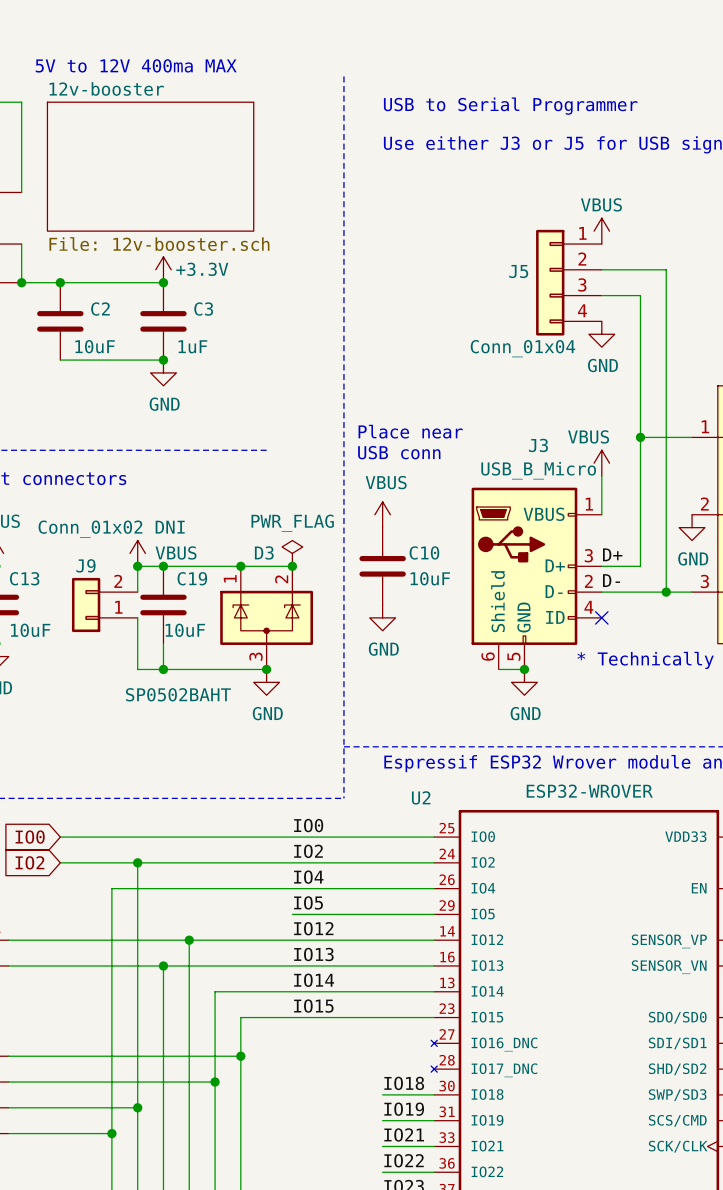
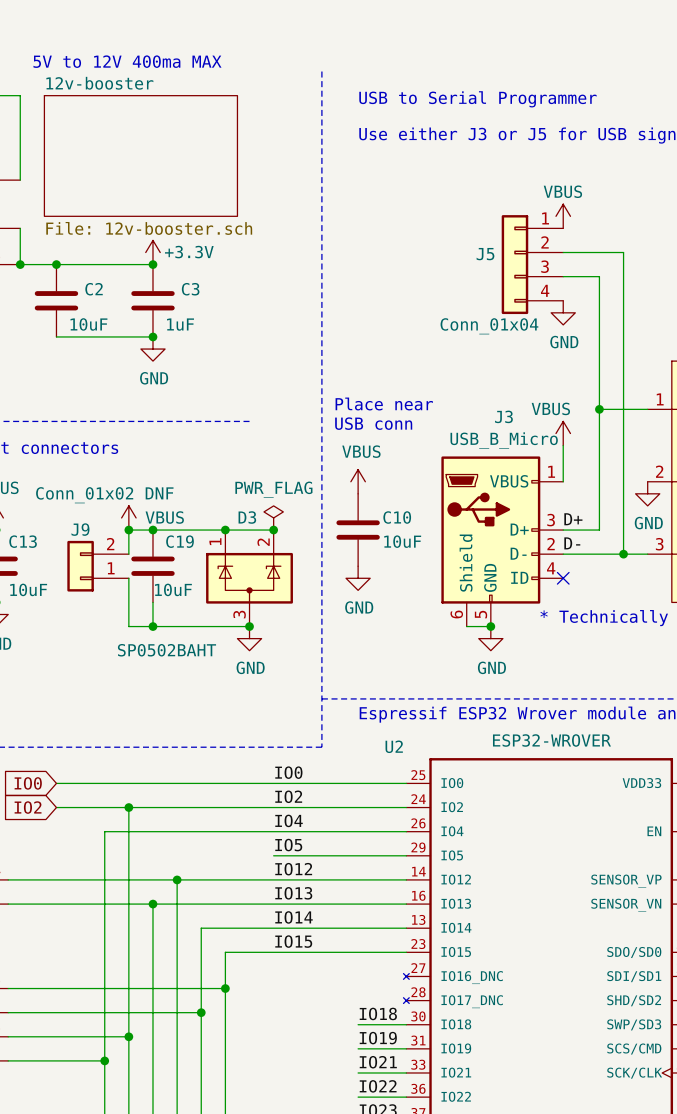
J9 value: Conn_01x02 DNI (111, 529) -> Conn_01x02 DNF (104, 495)

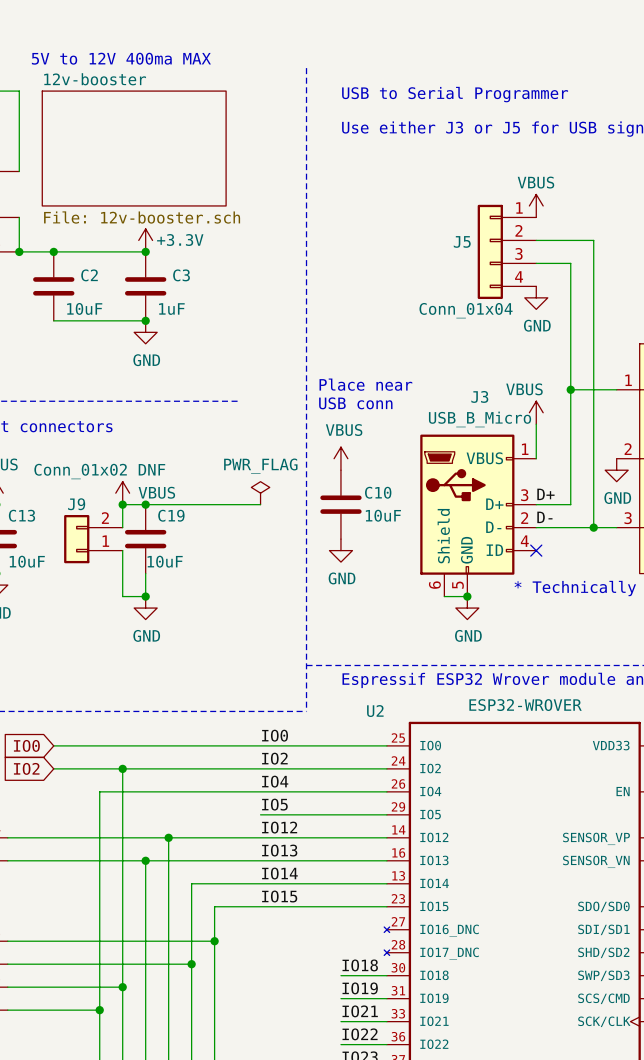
junction: (225, 530) -> none
junction: (273, 530) -> none
D3: SP0502BAHT (249, 578) -> none
wire: (152, 626) (249, 626) -> none
junction: (249, 626) -> none
power symbol position: GND (249, 638) -> GND (145, 608)

